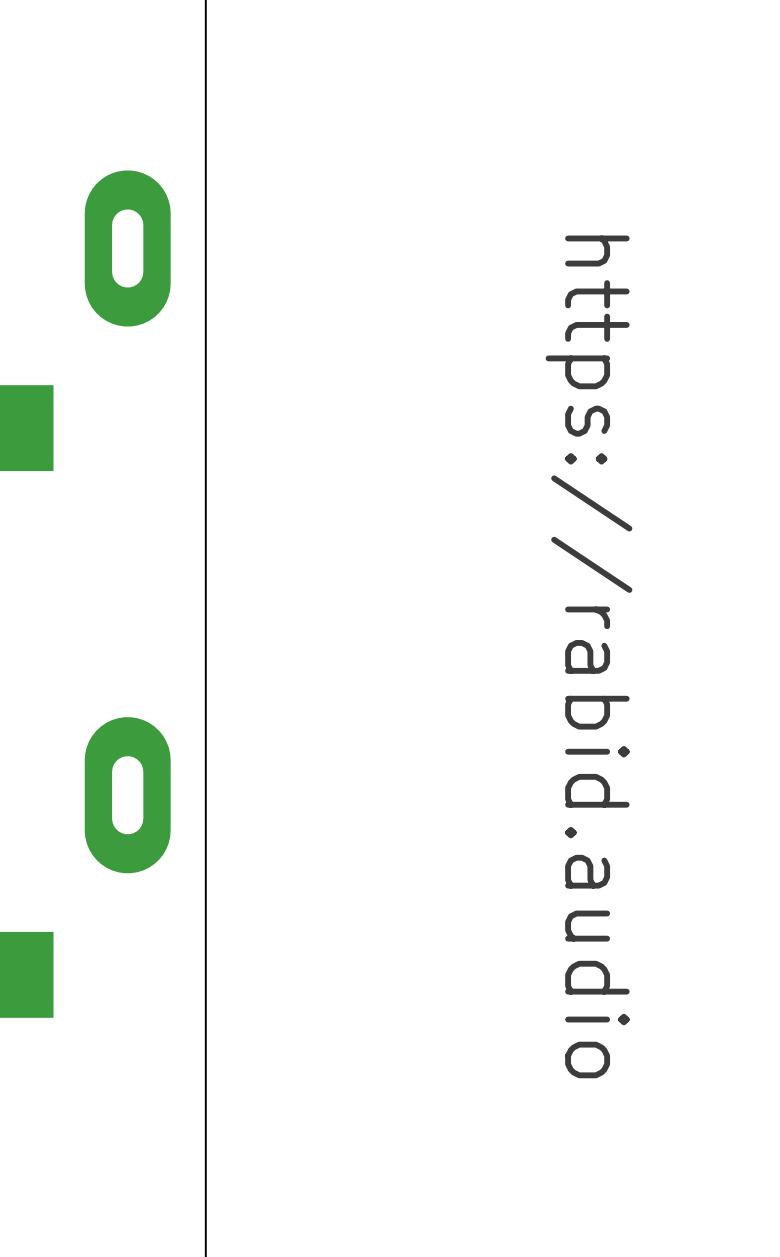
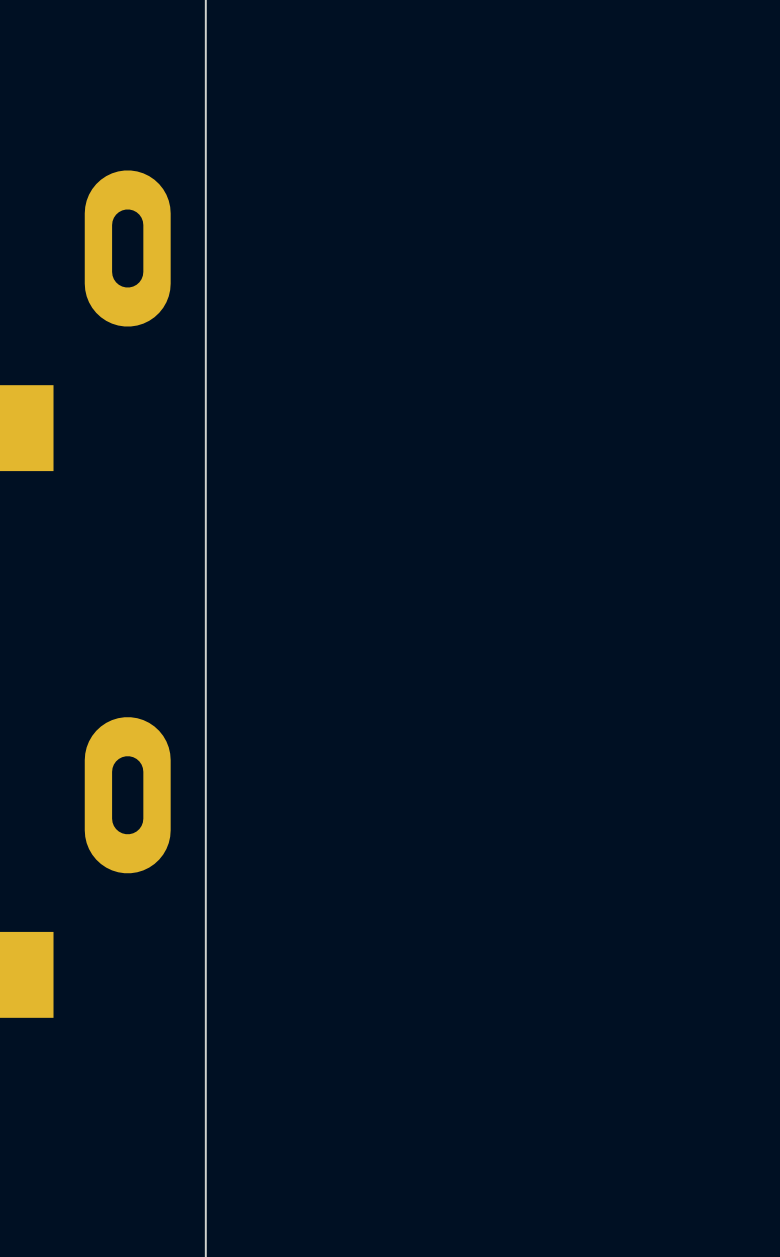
text: https://rabid.audio (589, 656) -> none

